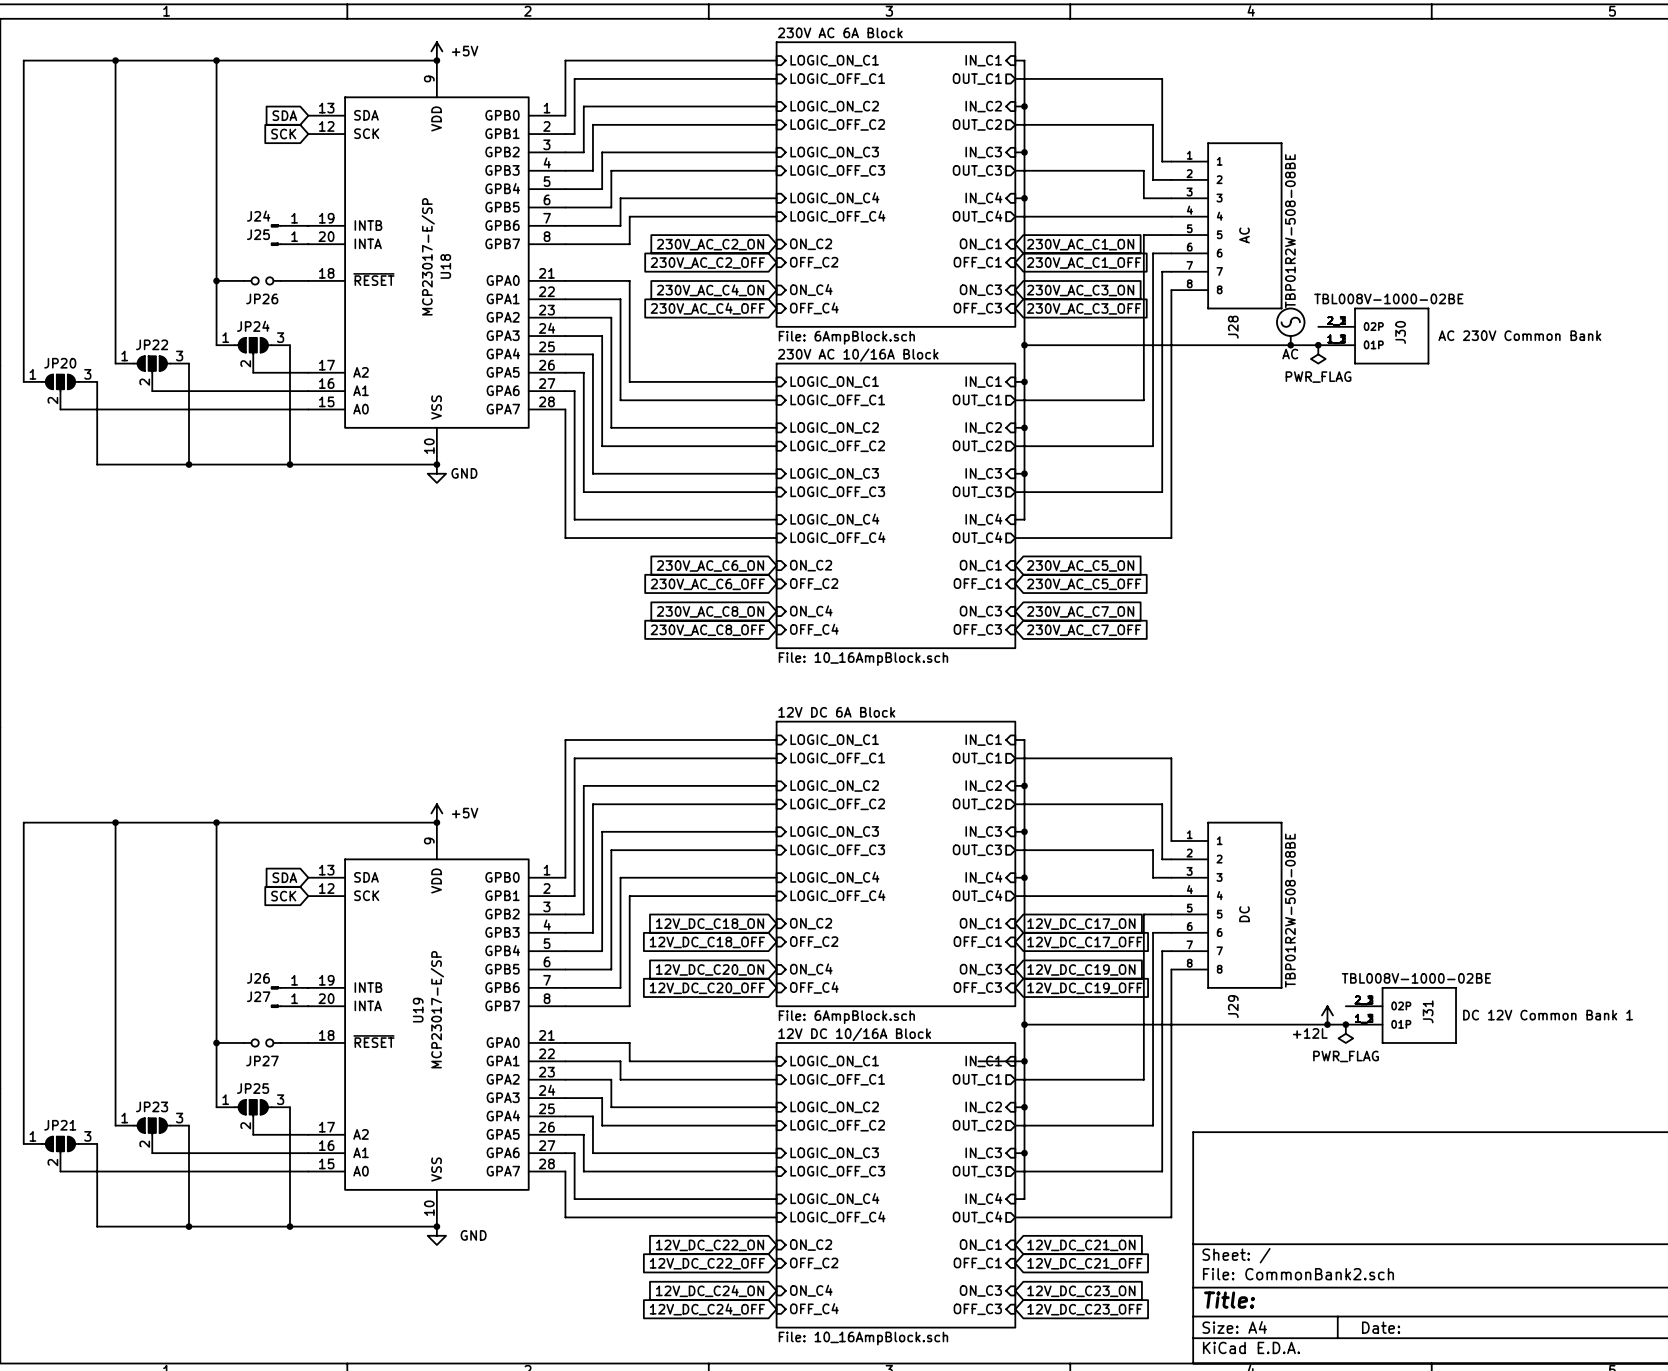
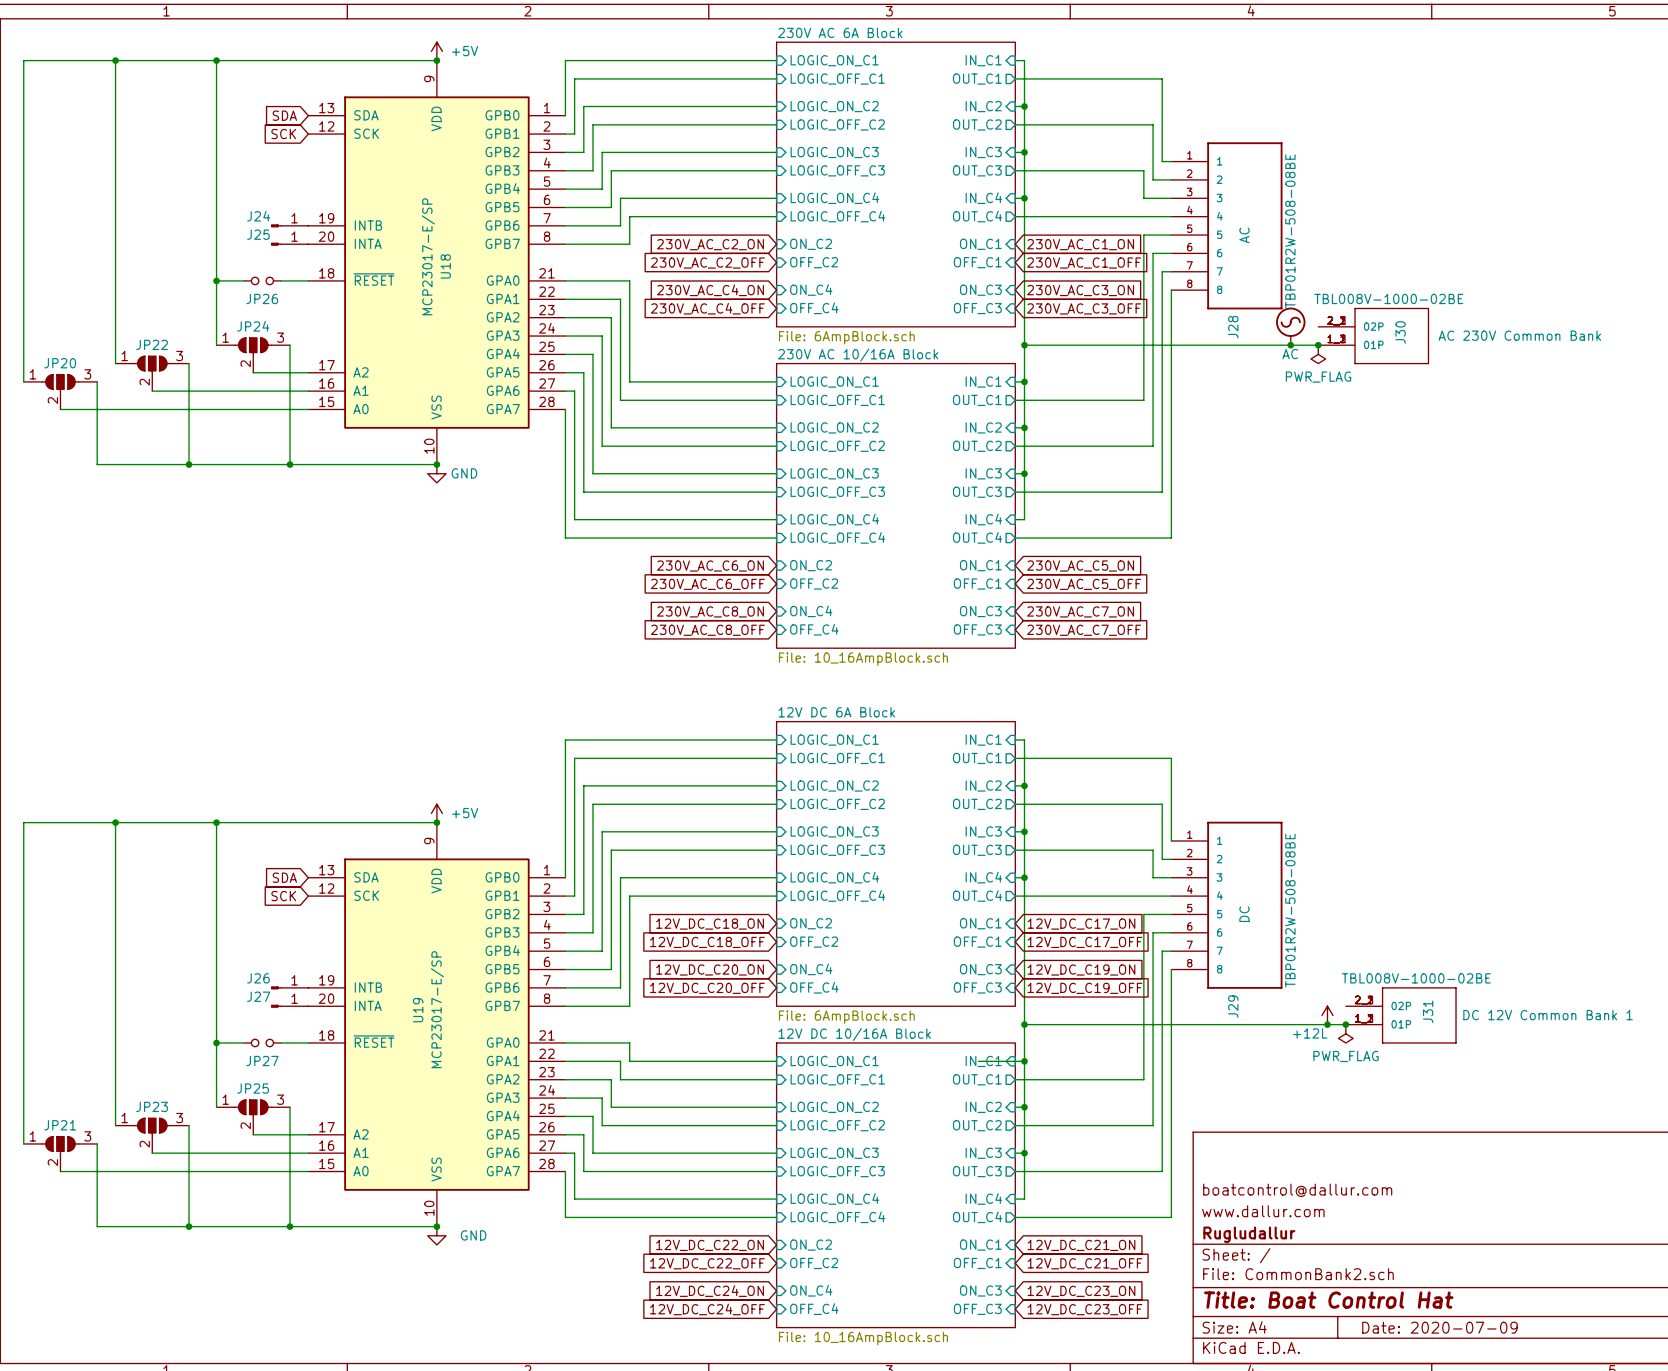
title block: none -> boatcontrol@dallur.com (1297, 1190)
title block: none -> www.dallur.com (1263, 1211)
title block: none -> Rugludallur (1249, 1234)
title block: Title: (1229, 1300) -> Title: Boat Control Hat (1328, 1300)
title block: Date: (1381, 1327) -> Date: 2020-07-09 (1439, 1327)

